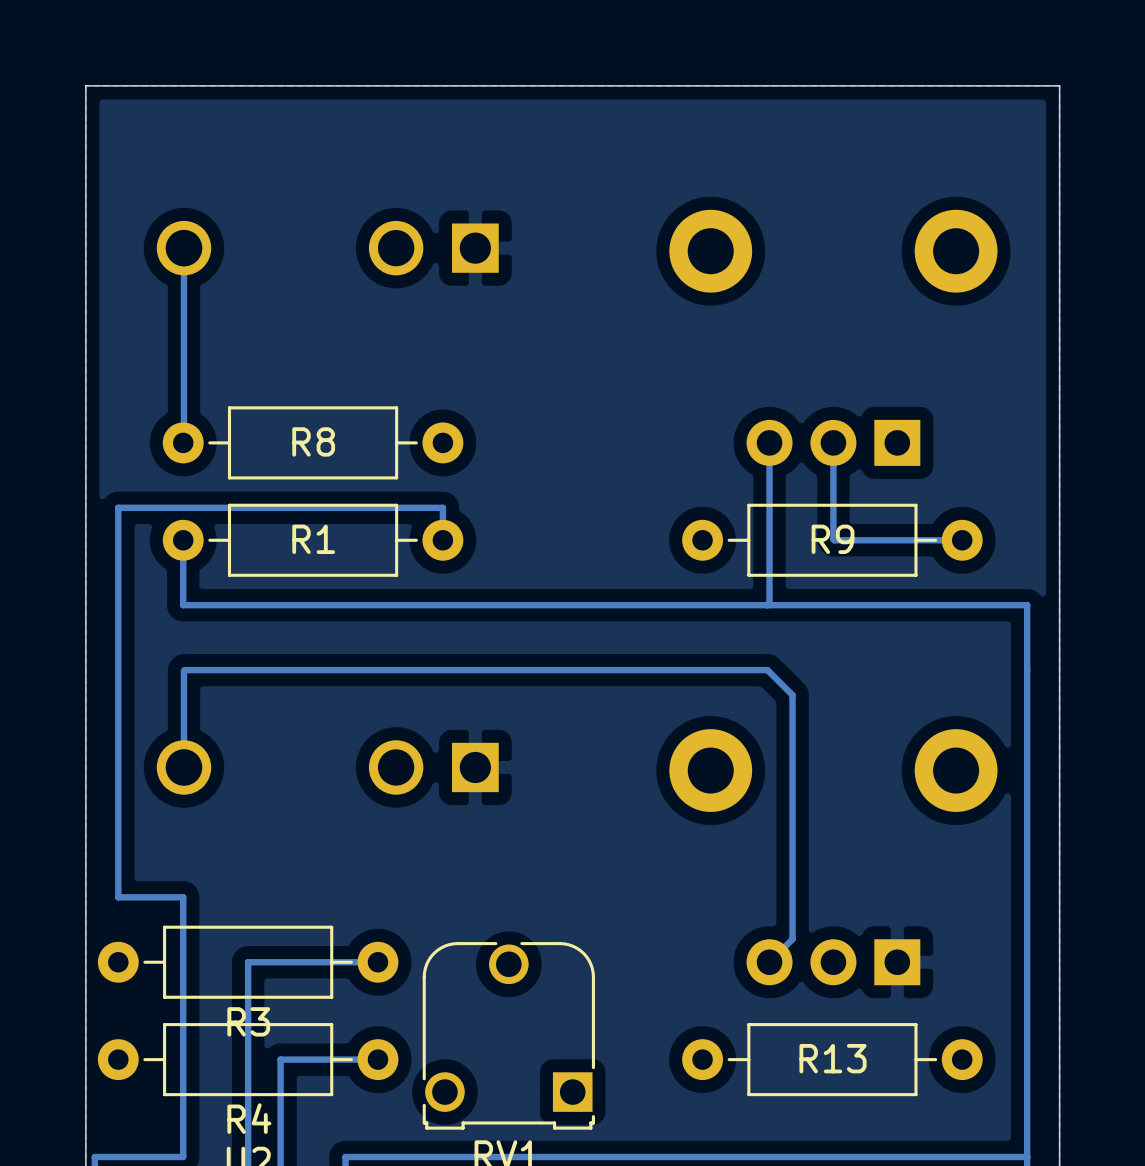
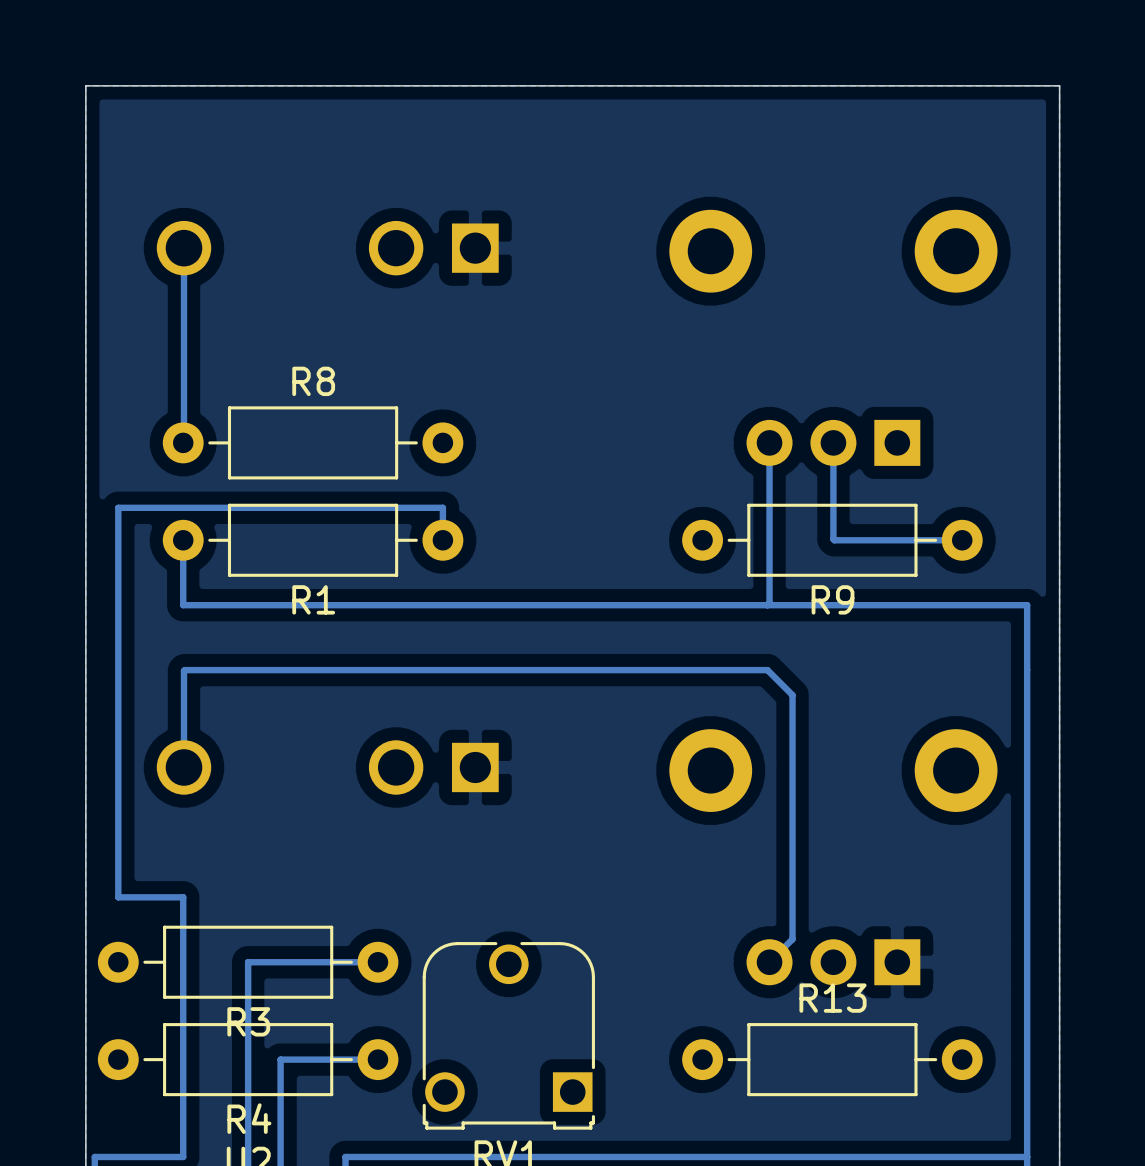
R8 name position: R8 (313, 441) -> R8 (313, 381)
R1 name position: R1 (313, 539) -> R1 (313, 599)
R9 name position: R9 (833, 539) -> R9 (833, 599)
R13 name position: R13 (833, 1058) -> R13 (833, 998)

